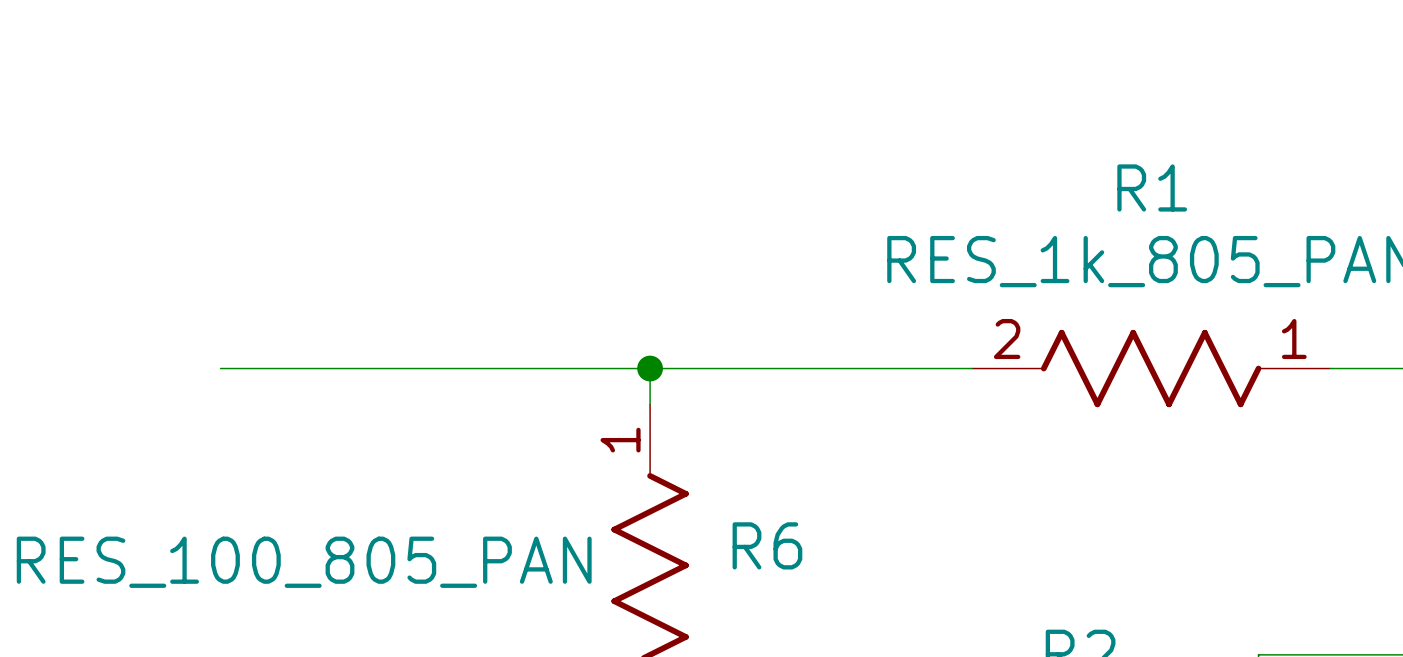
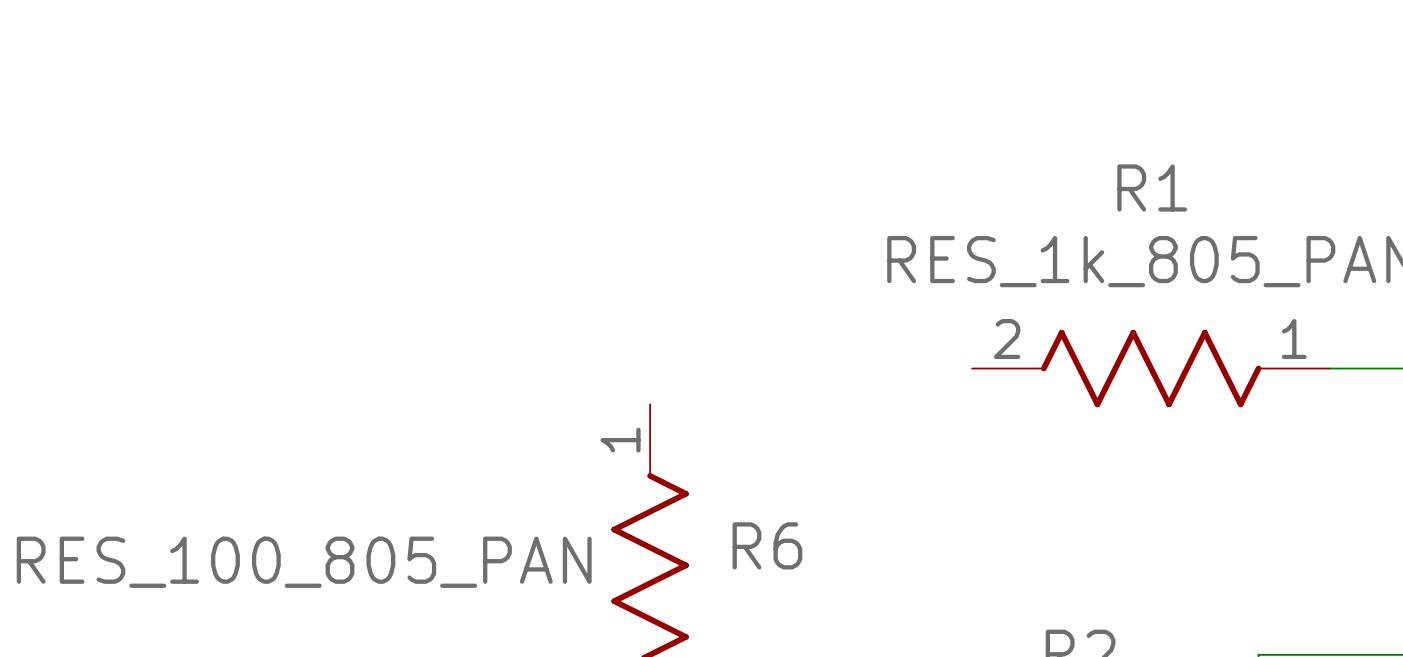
wire: (220, 368) (972, 368) -> none
wire: (650, 368) (650, 404) -> none
junction: (650, 368) -> none

